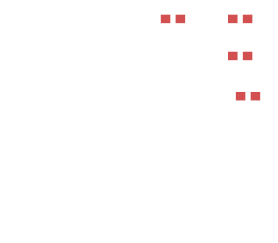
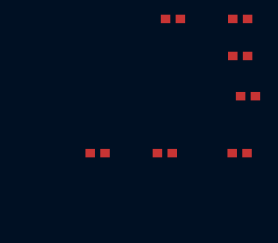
part: none -> (97, 153)
part: none -> (164, 153)
part: none -> (239, 153)

